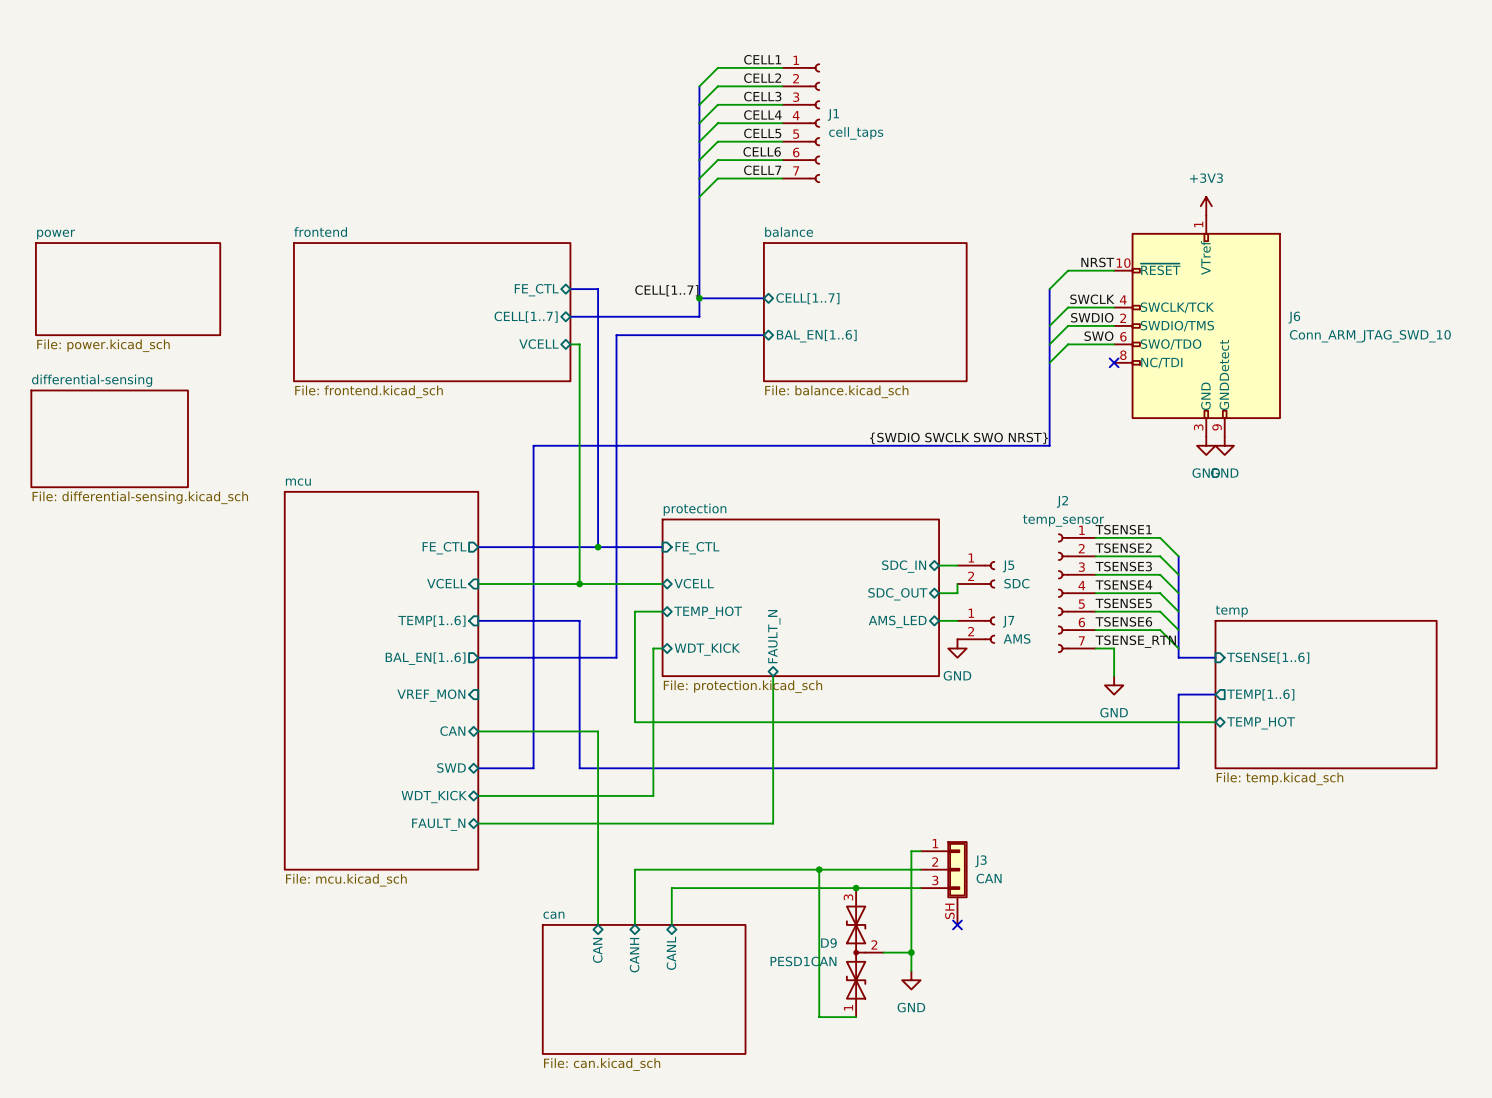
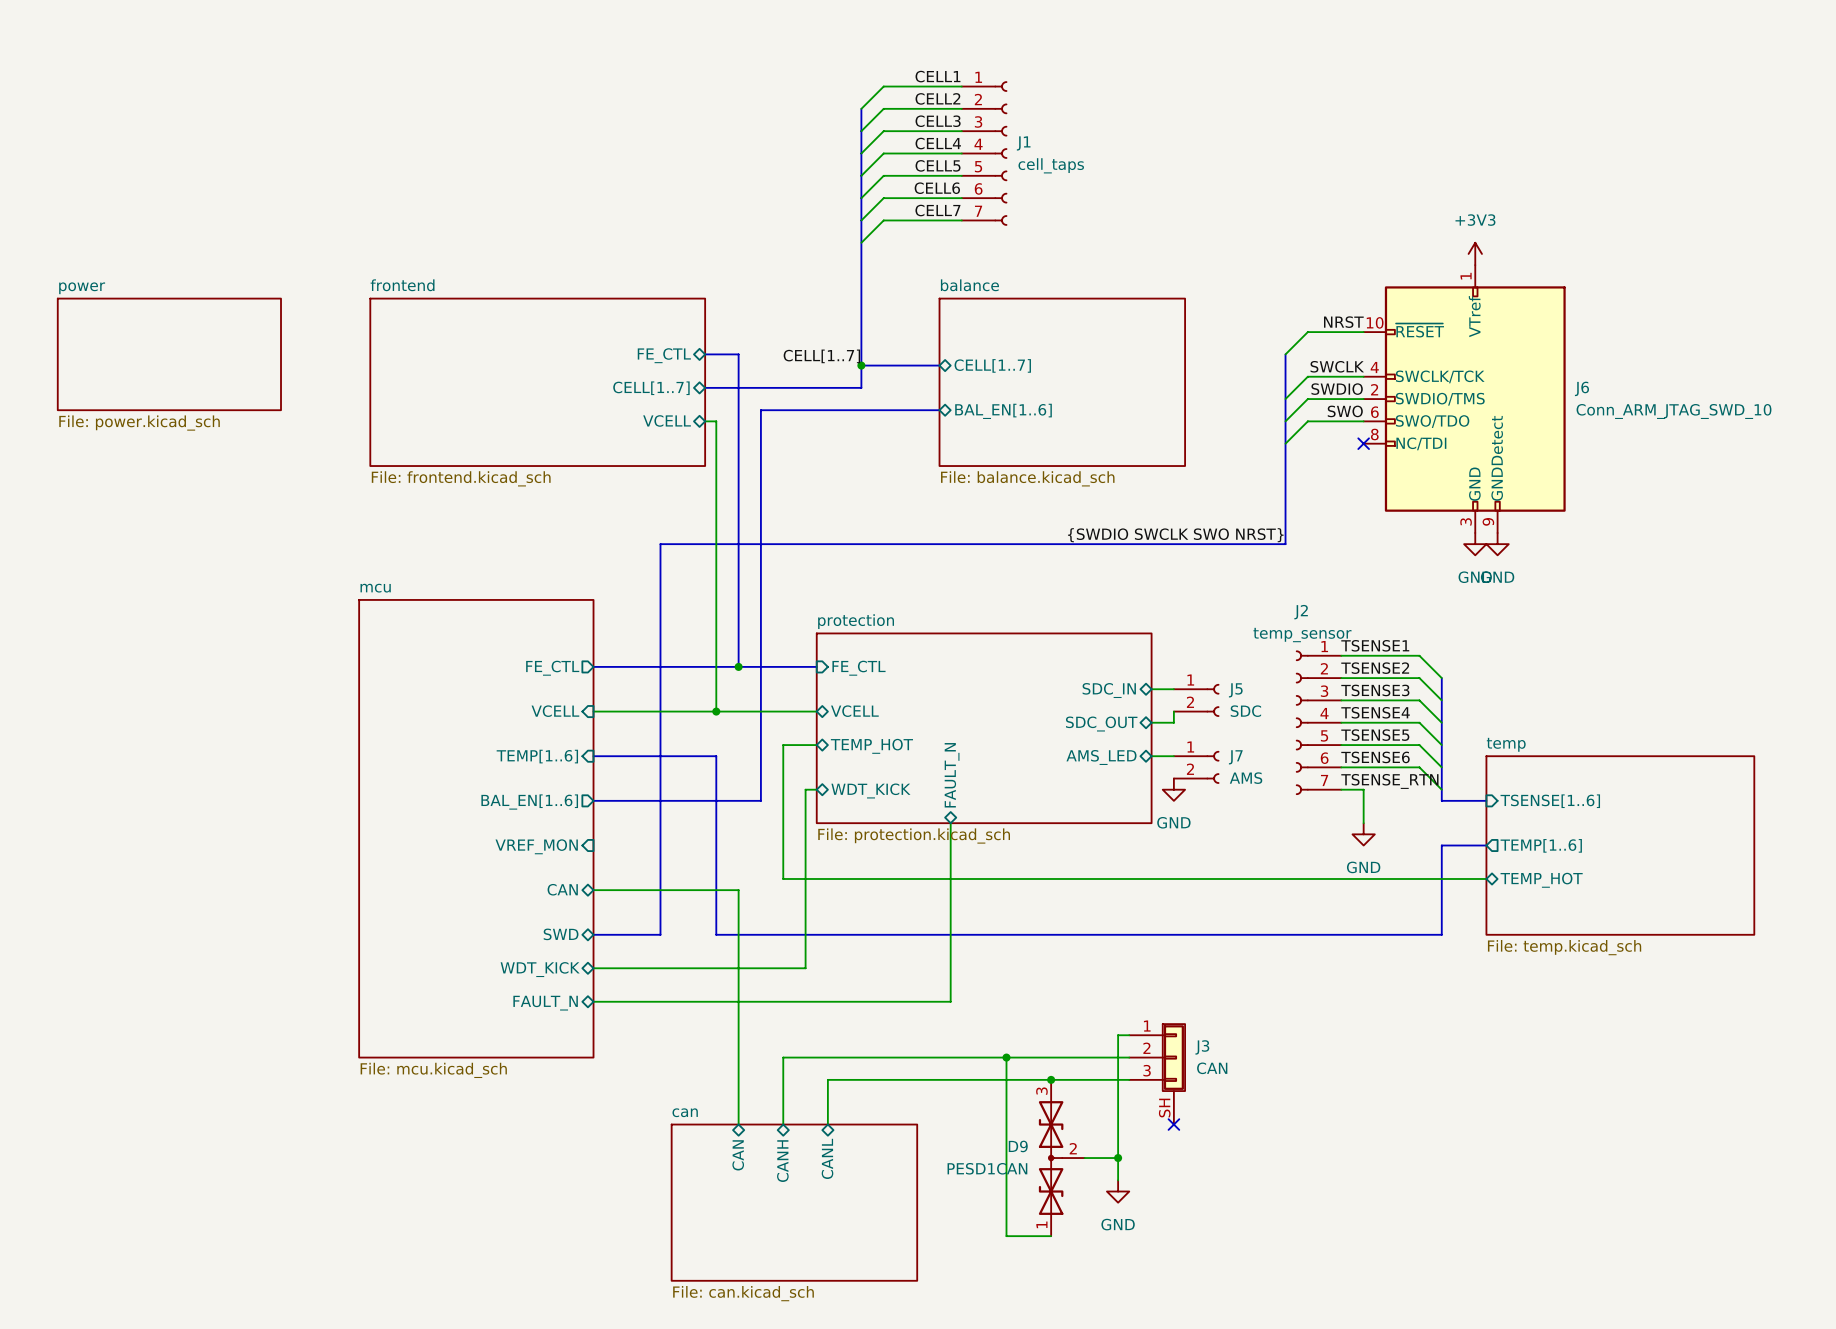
sheet differential-sensing: File: differential-sensing.kicad_sch (109, 438) -> none

